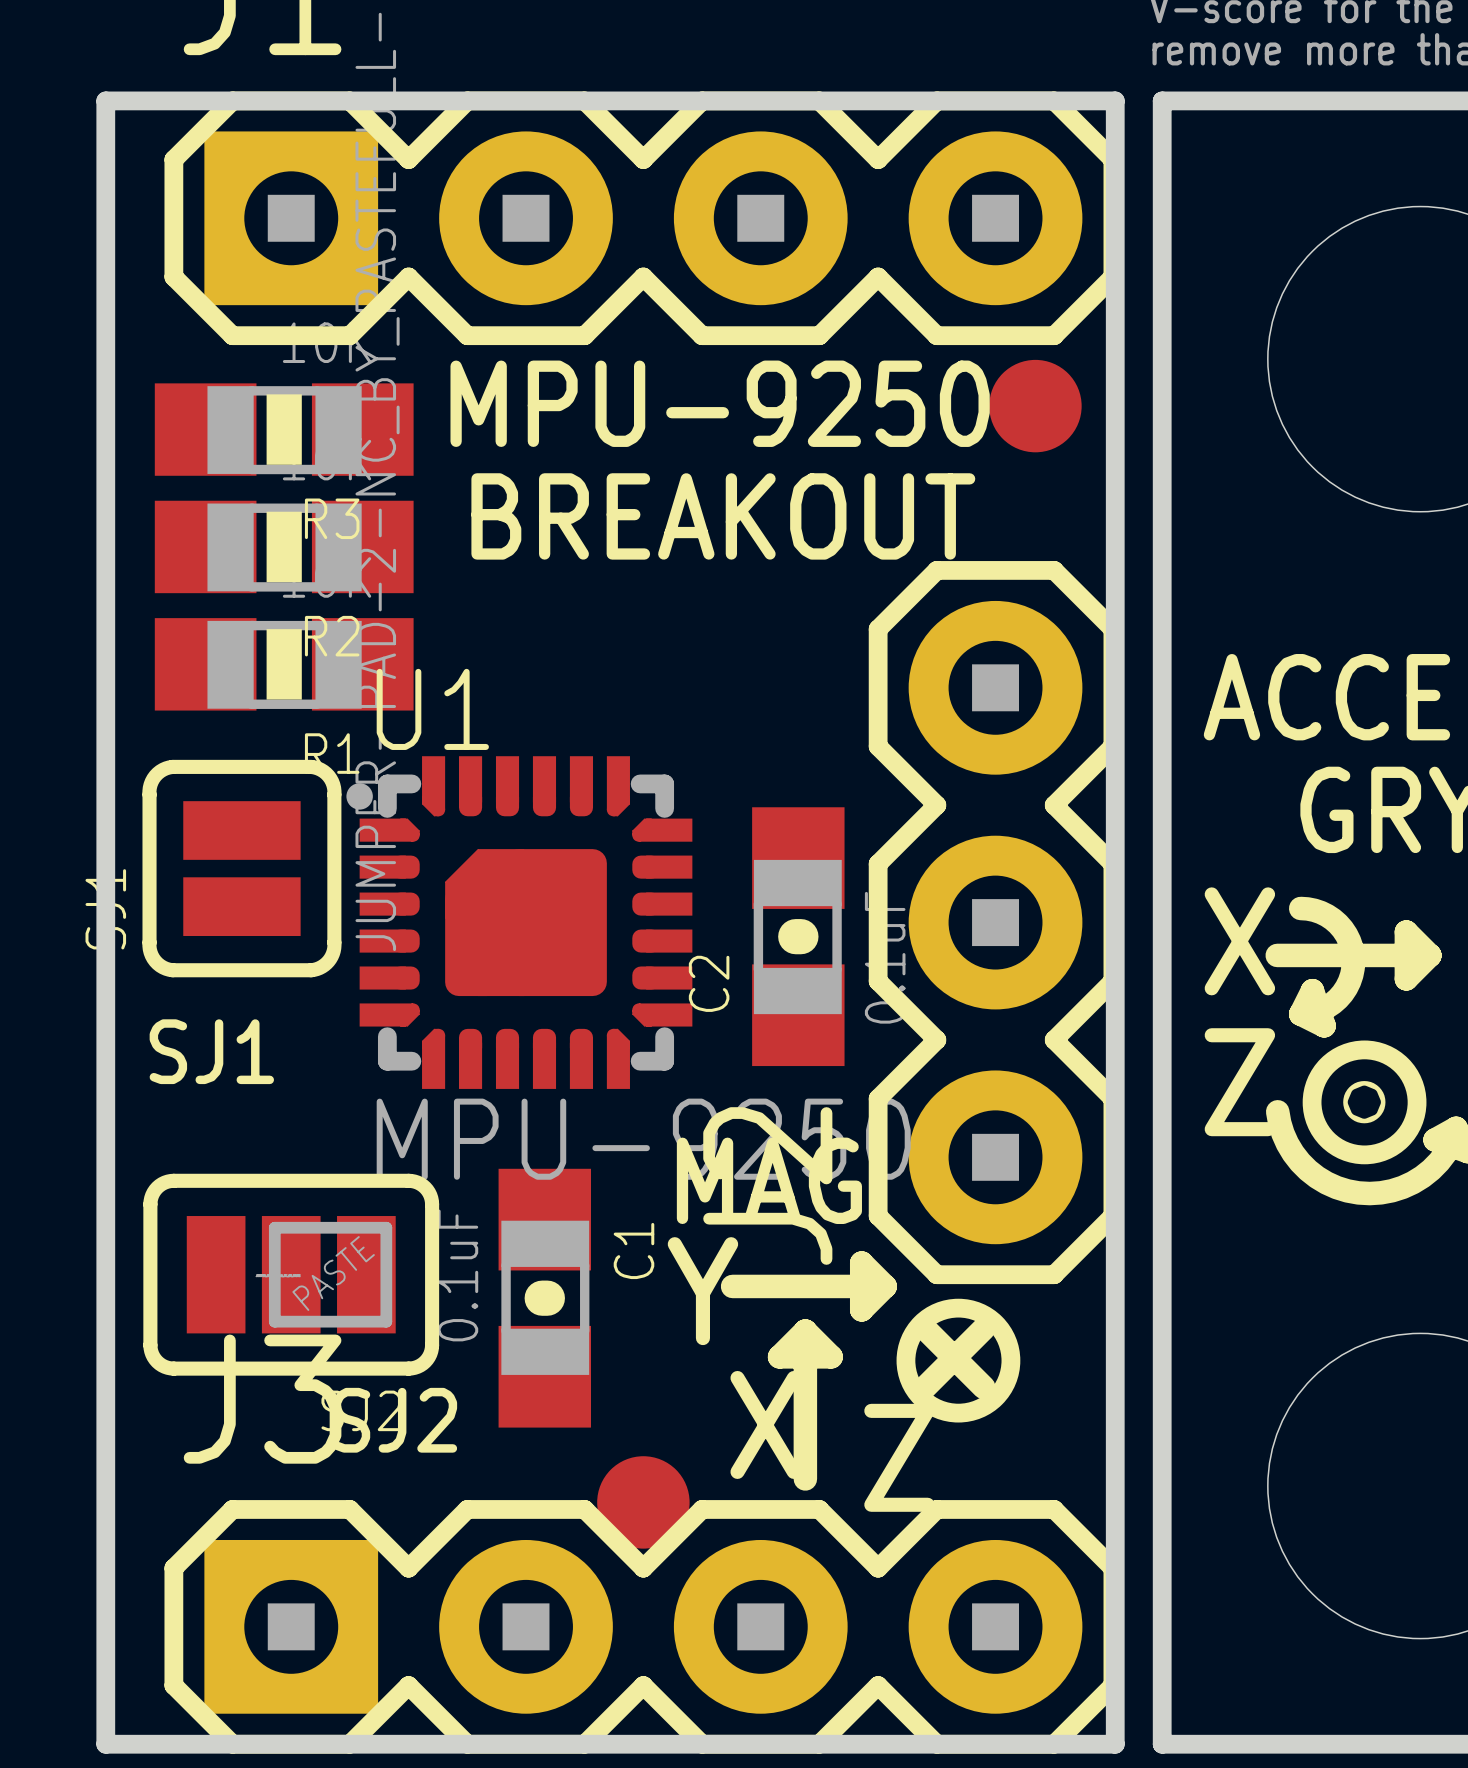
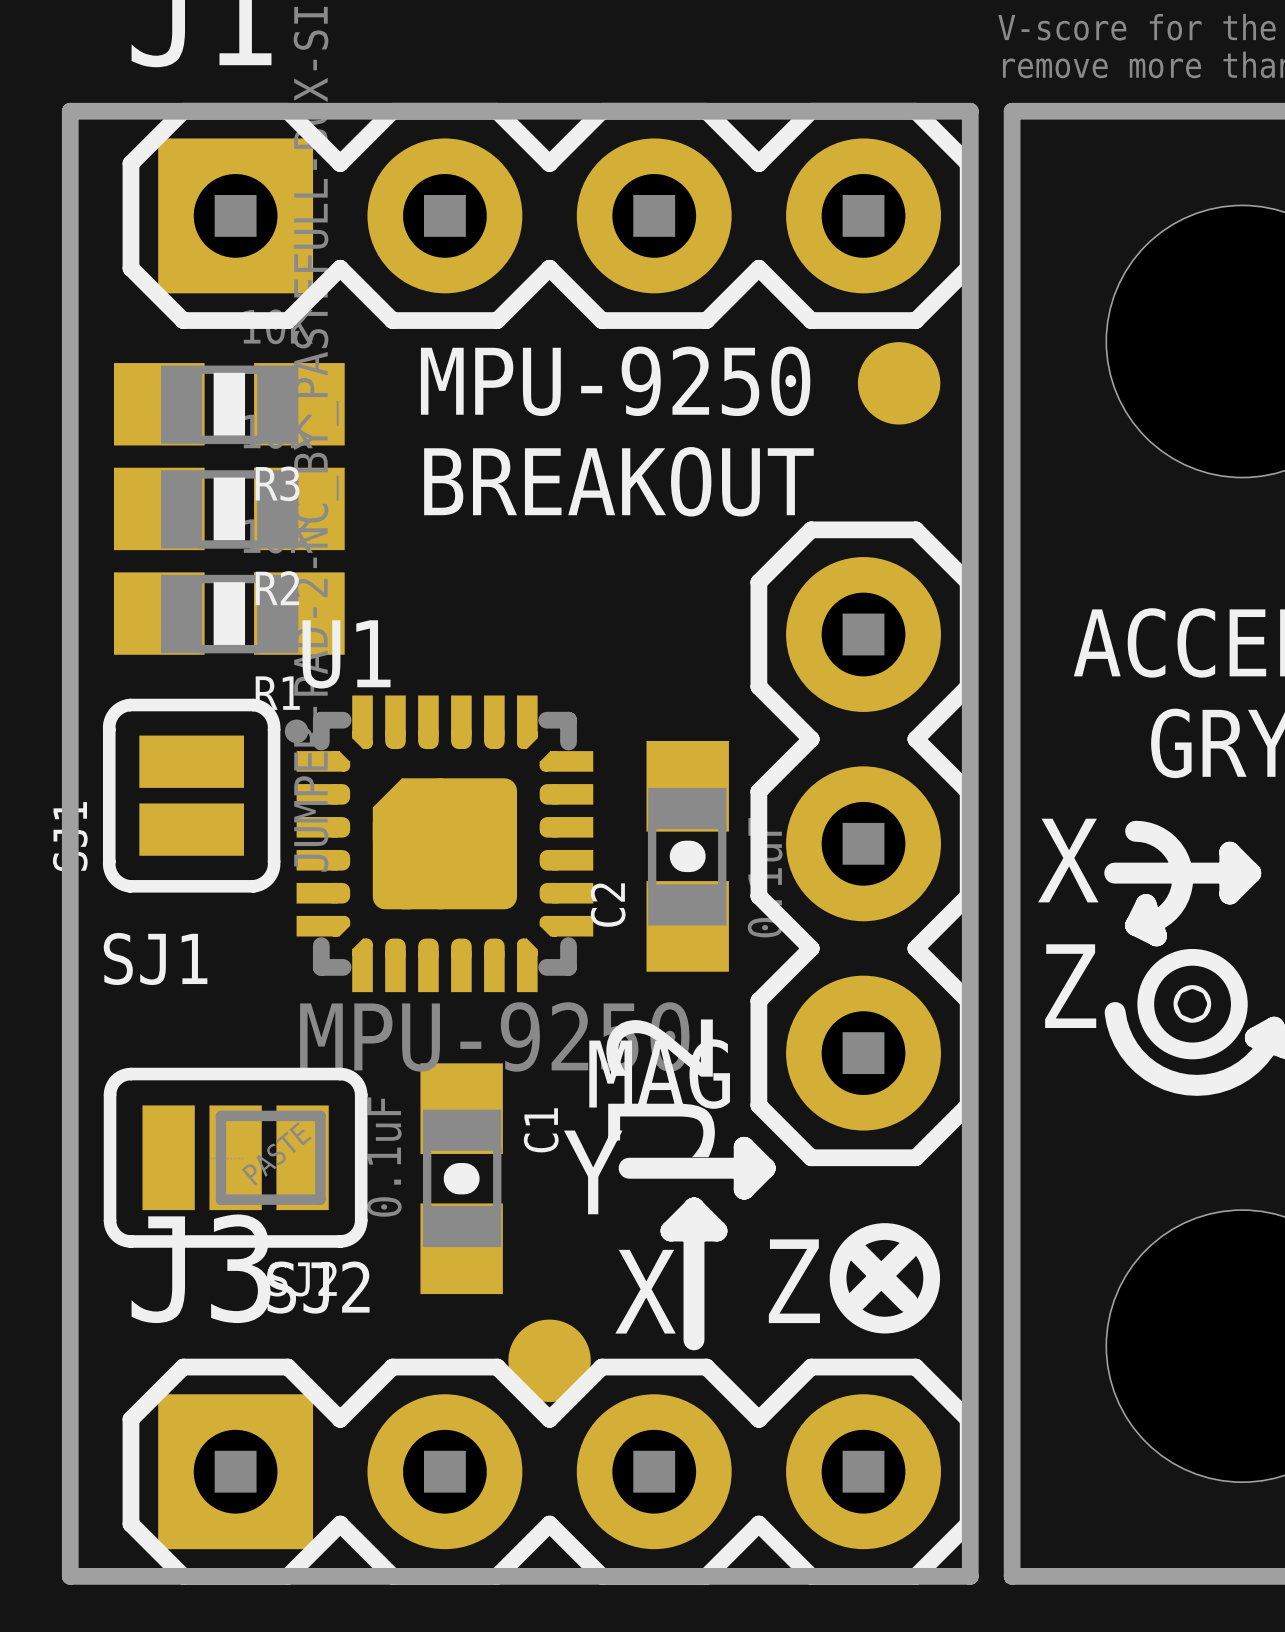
line: (925, 1328) (983, 1387) -> (855, 1249) (907, 1302)
line: (983, 1328) (925, 1387) -> (907, 1249) (855, 1302)
drawing position: (958, 1360) -> (884, 1278)
text position: Z (899, 1457) -> Z (794, 1281)

